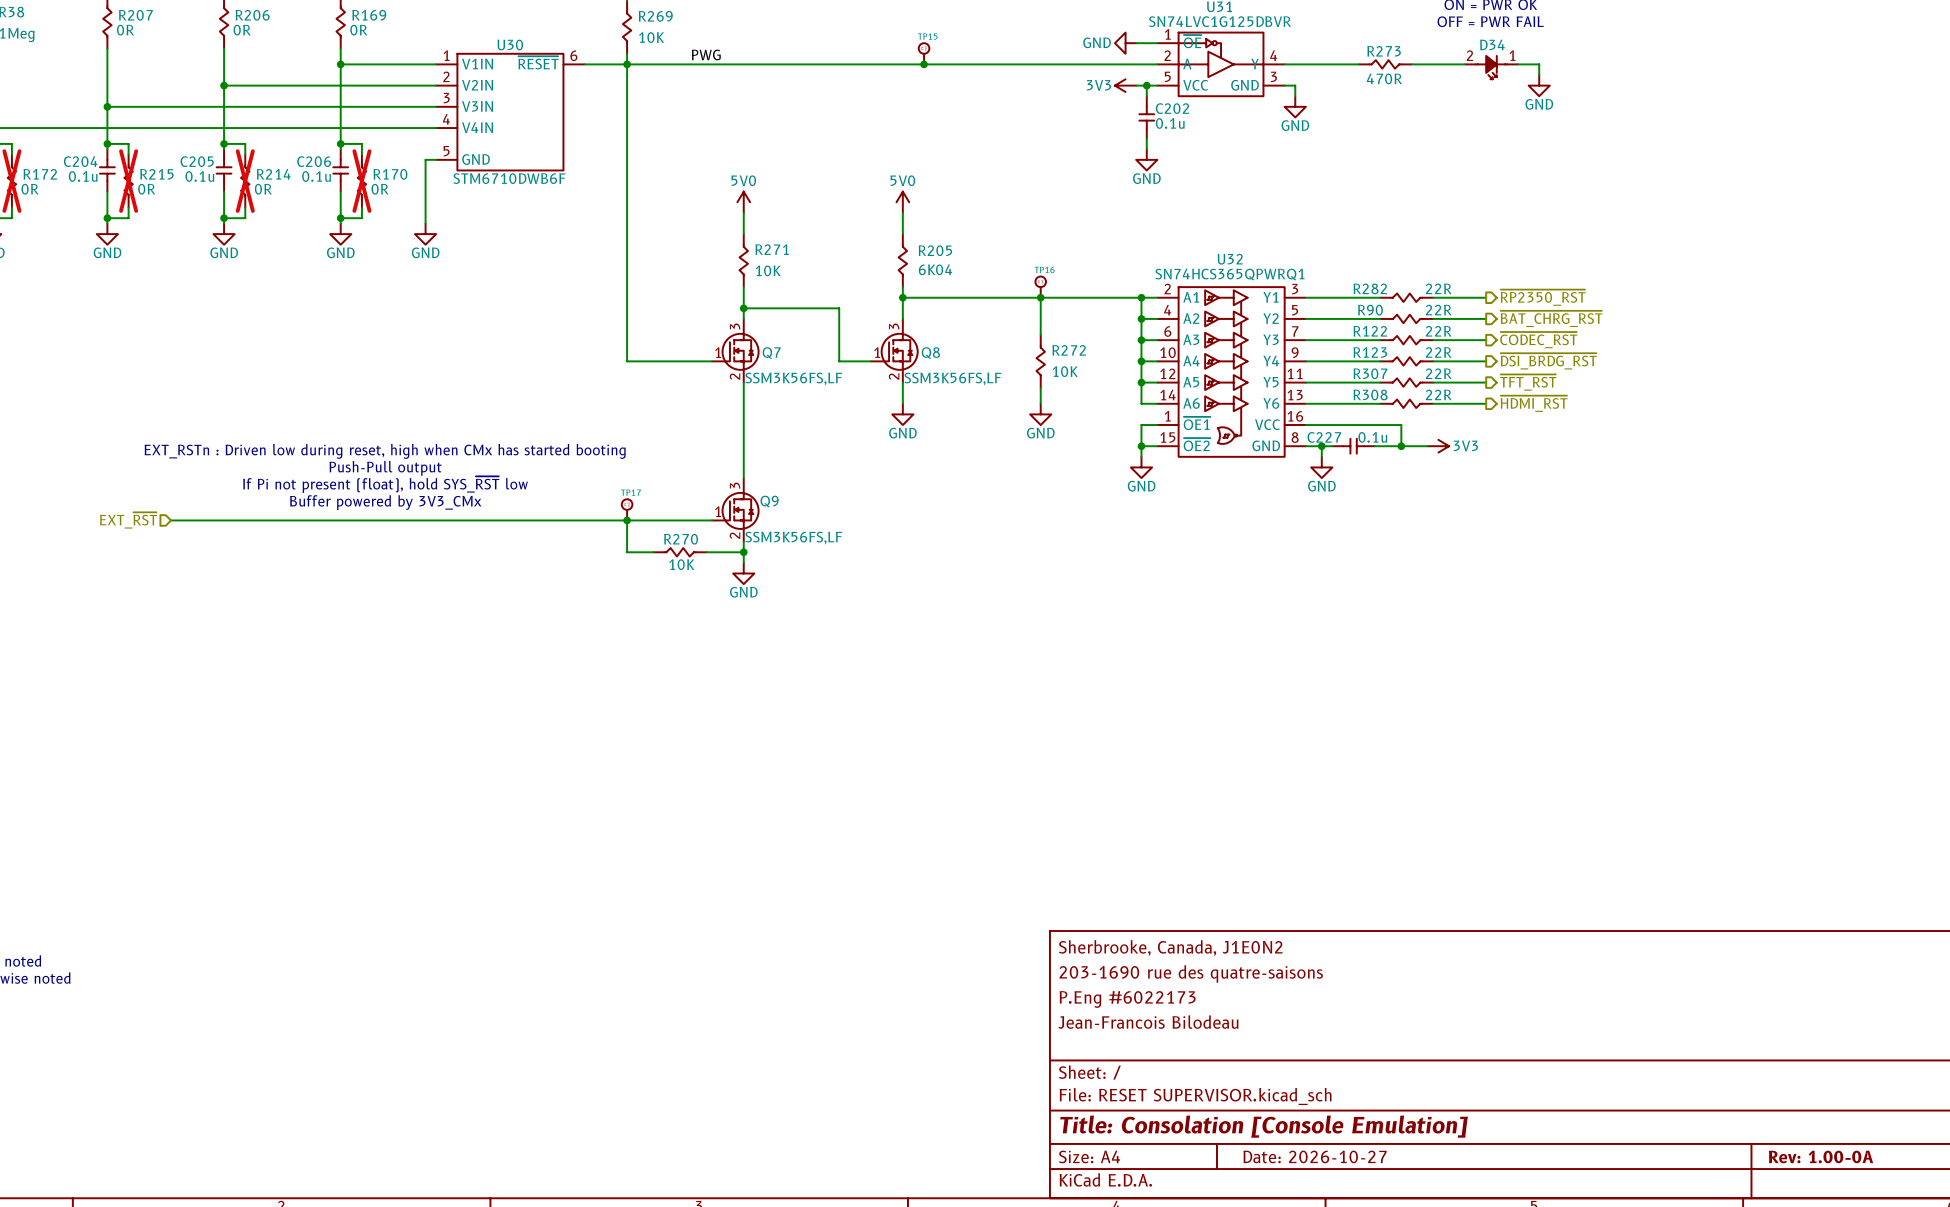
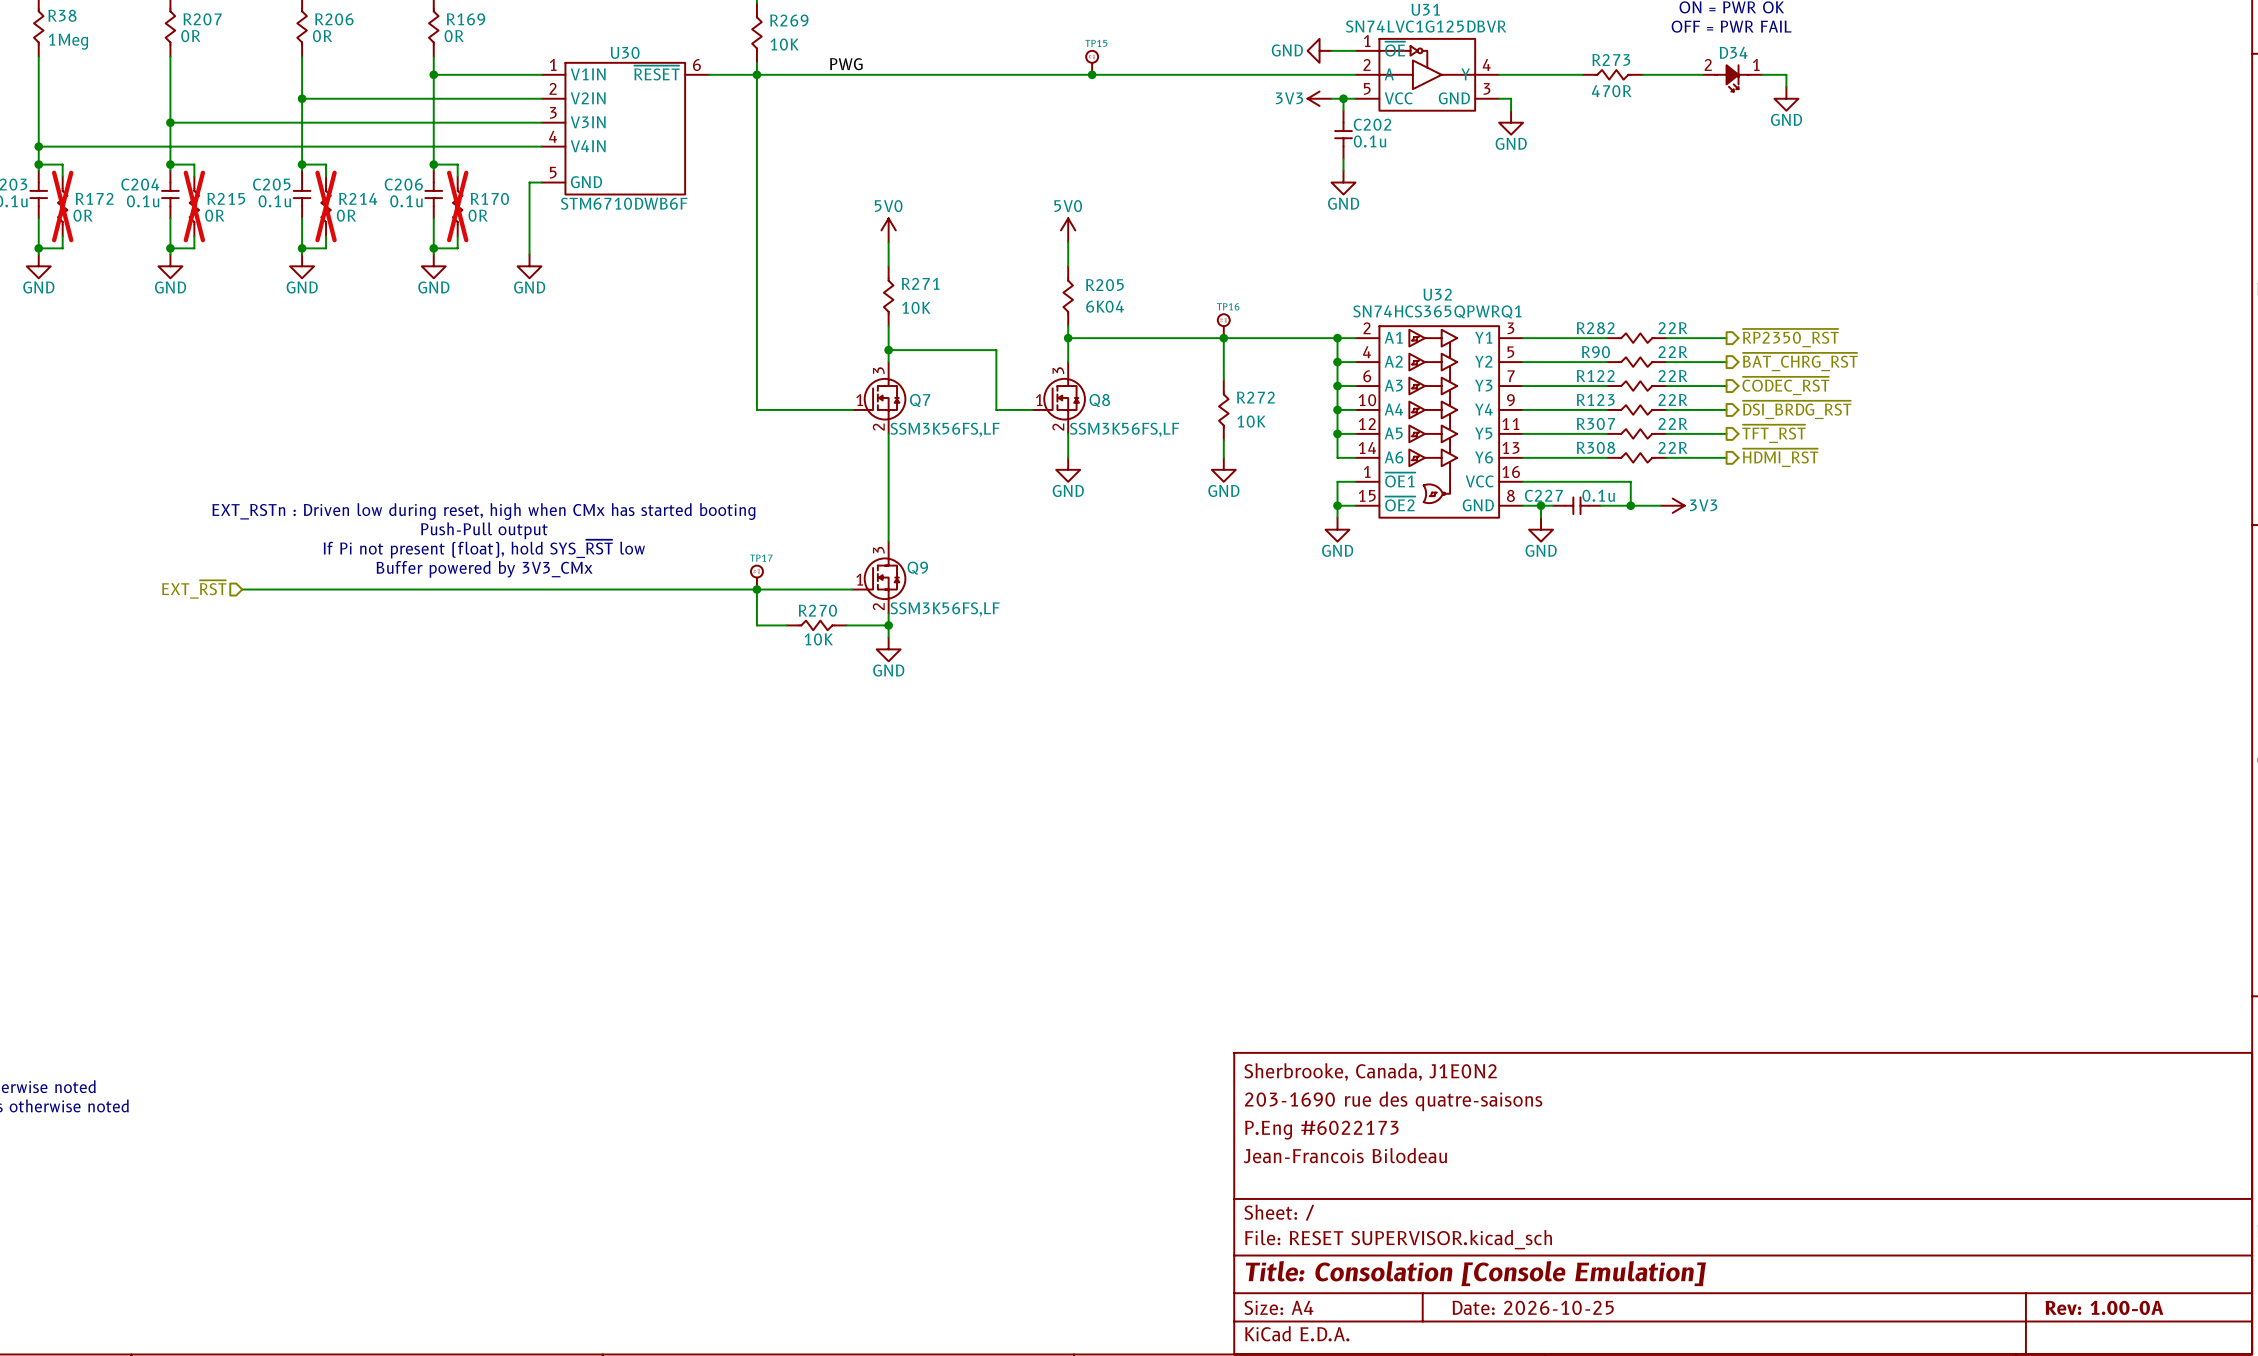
title block: Date: 2026-10-27 (1315, 1156) -> Date: 2026-10-25 (1533, 1307)

